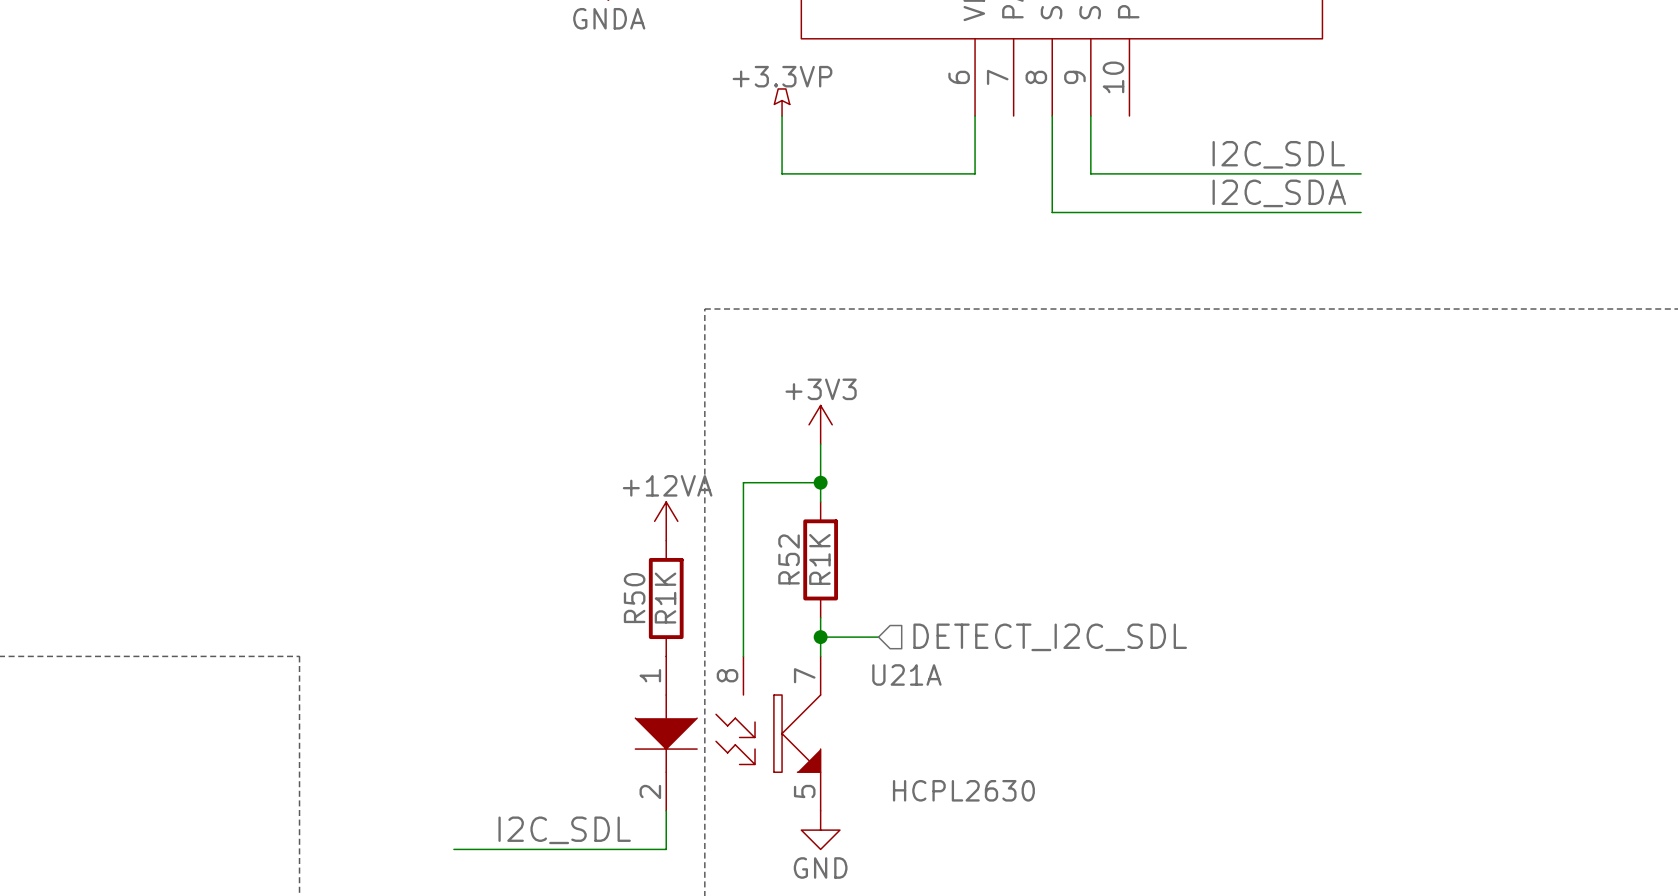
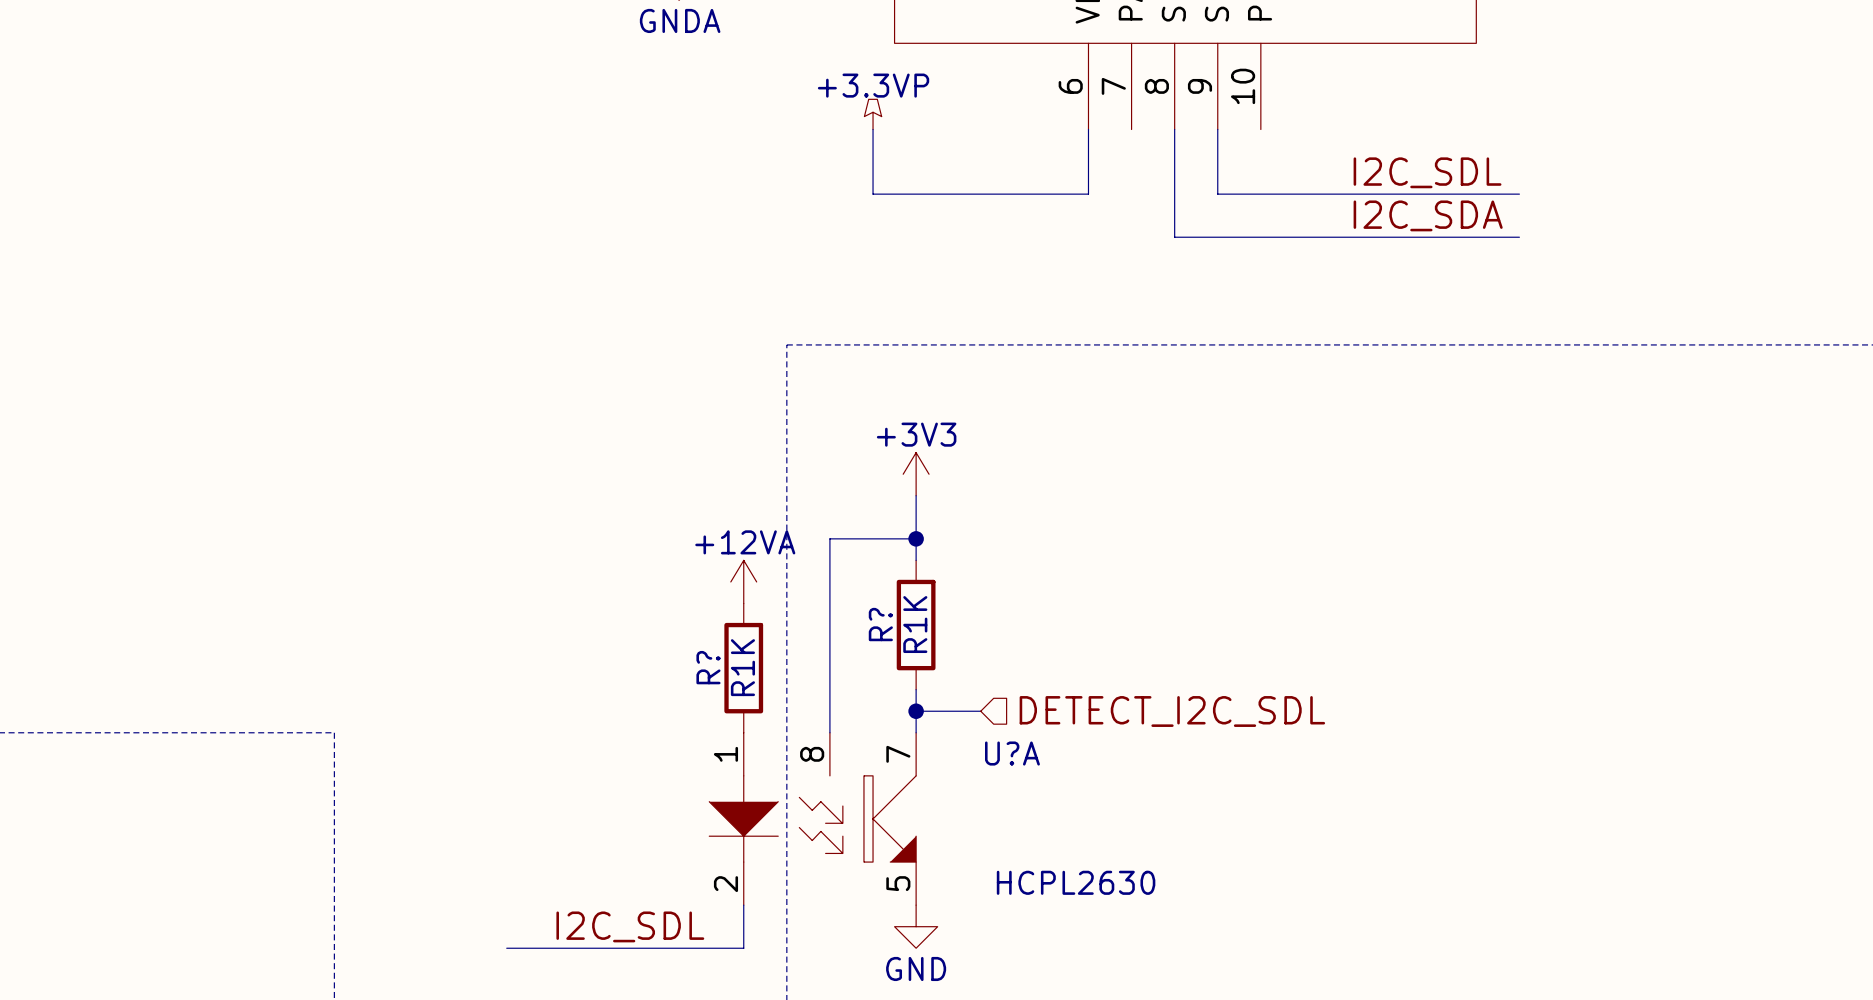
R52 name: R52 (789, 559) -> R? (880, 624)
R50 name: R50 (634, 598) -> R? (708, 667)
U21A name: U21A (906, 674) -> U?A (1012, 753)

